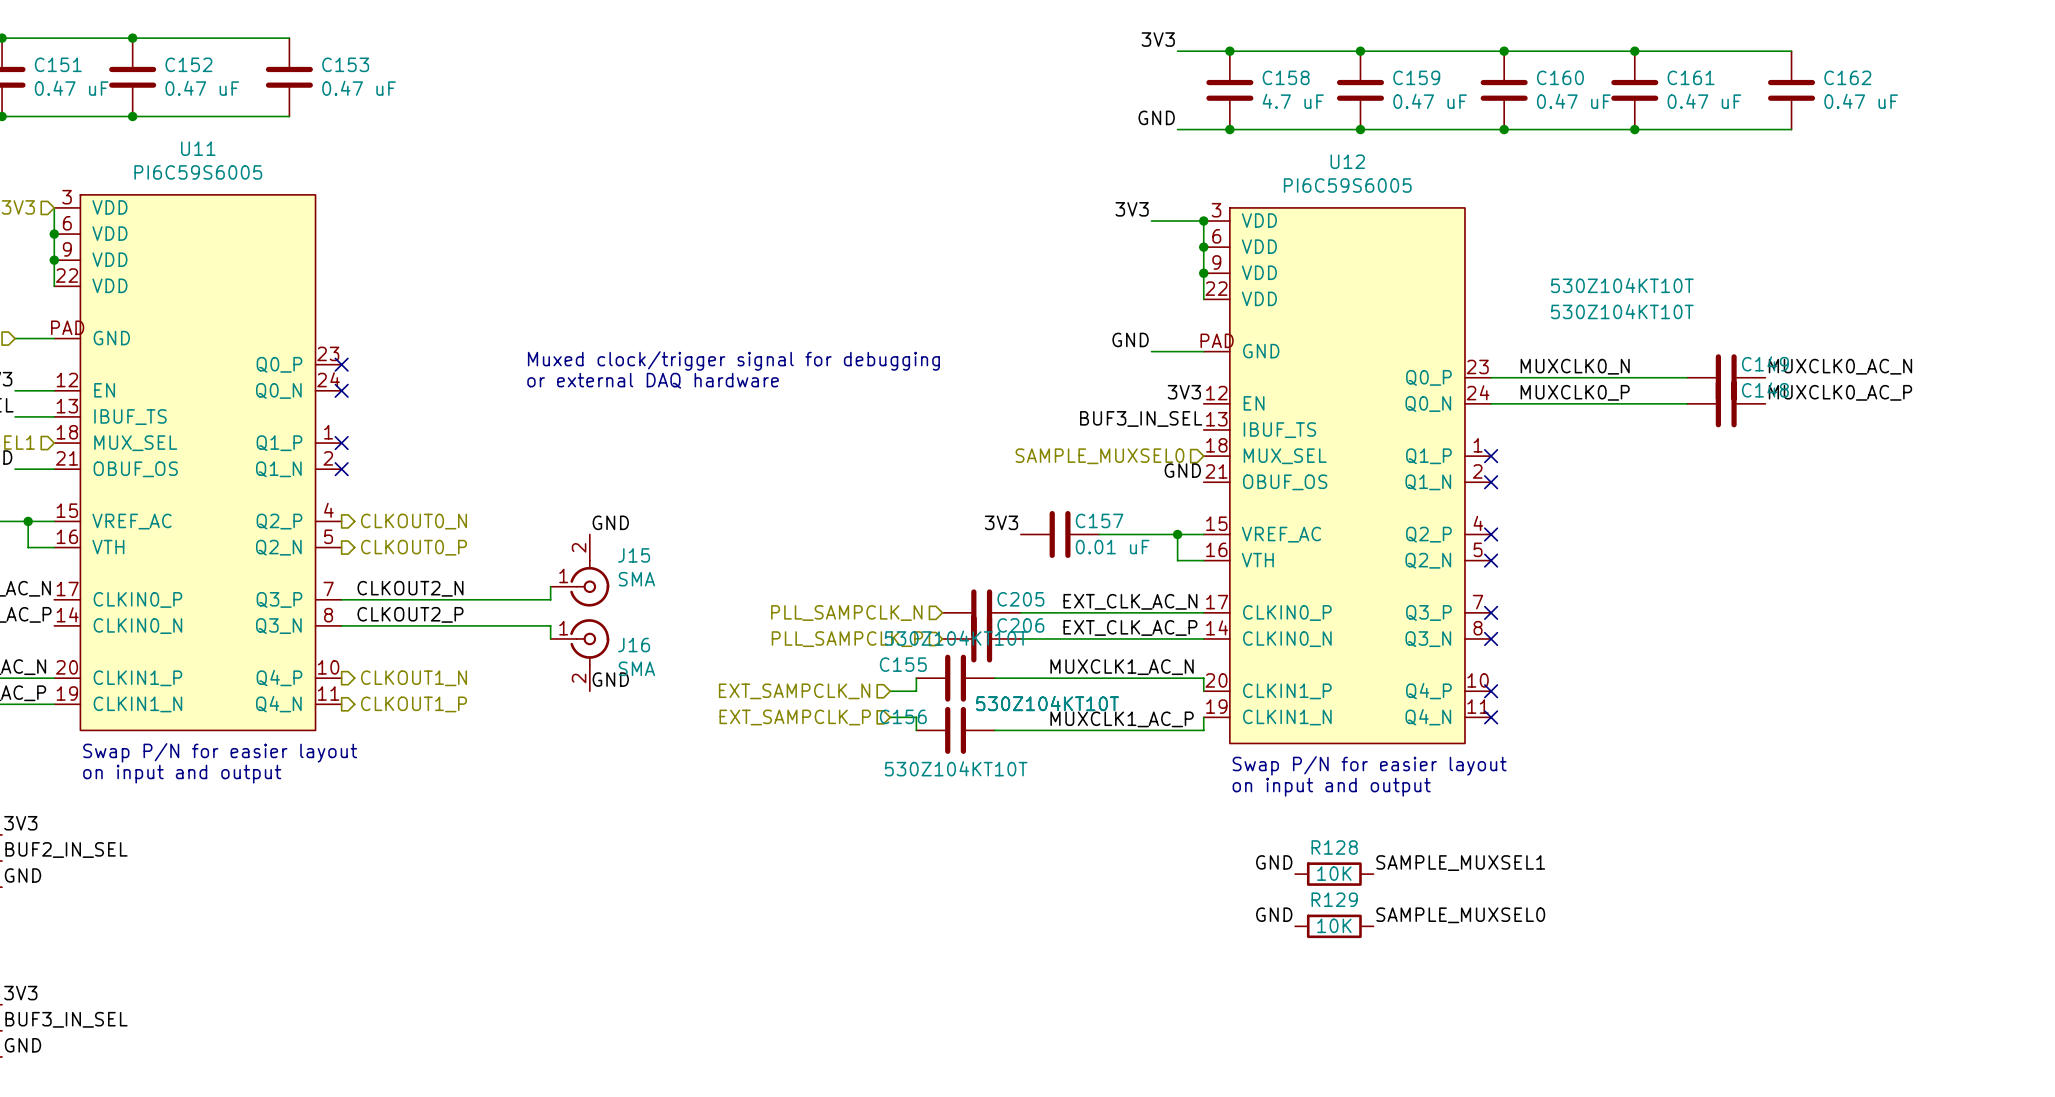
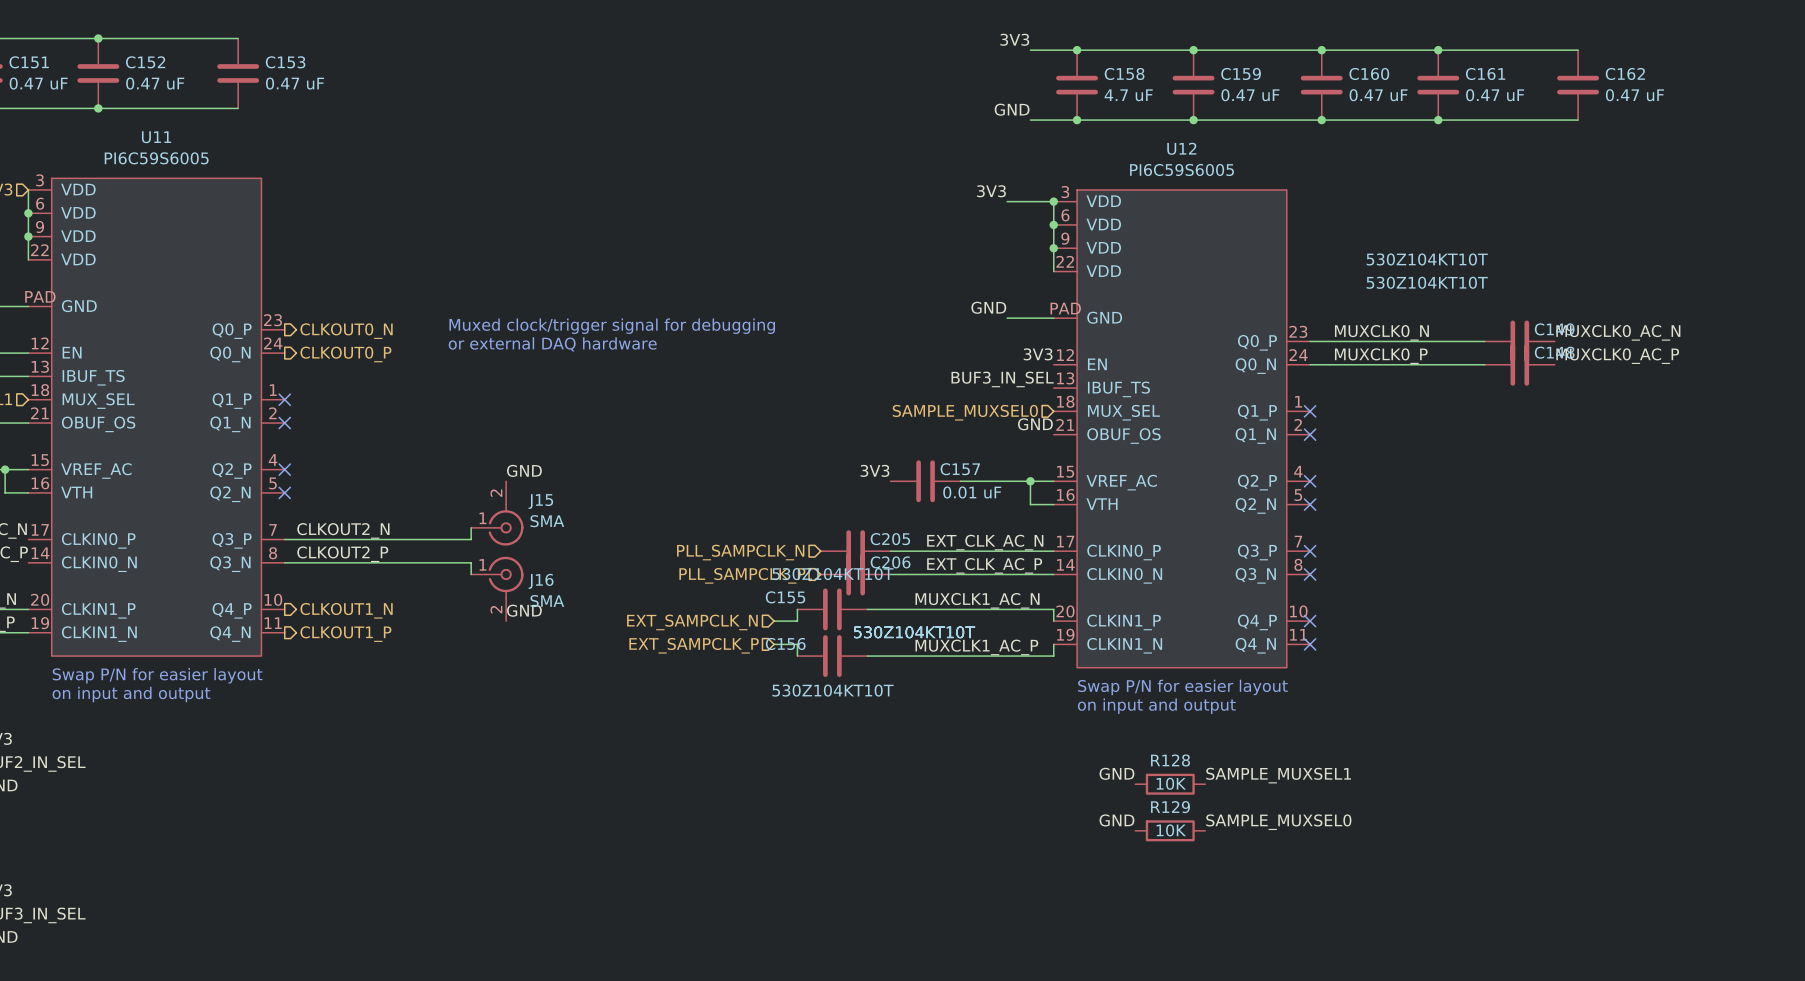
no-connect mark: (341, 364) -> none
no-connect mark: (341, 390) -> none
no-connect mark: none -> (284, 469)
hierarchical label position: CLKOUT0_N (414, 521) -> CLKOUT0_N (346, 331)
no-connect mark: none -> (284, 492)
hierarchical label position: CLKOUT0_P (414, 547) -> CLKOUT0_P (345, 354)

